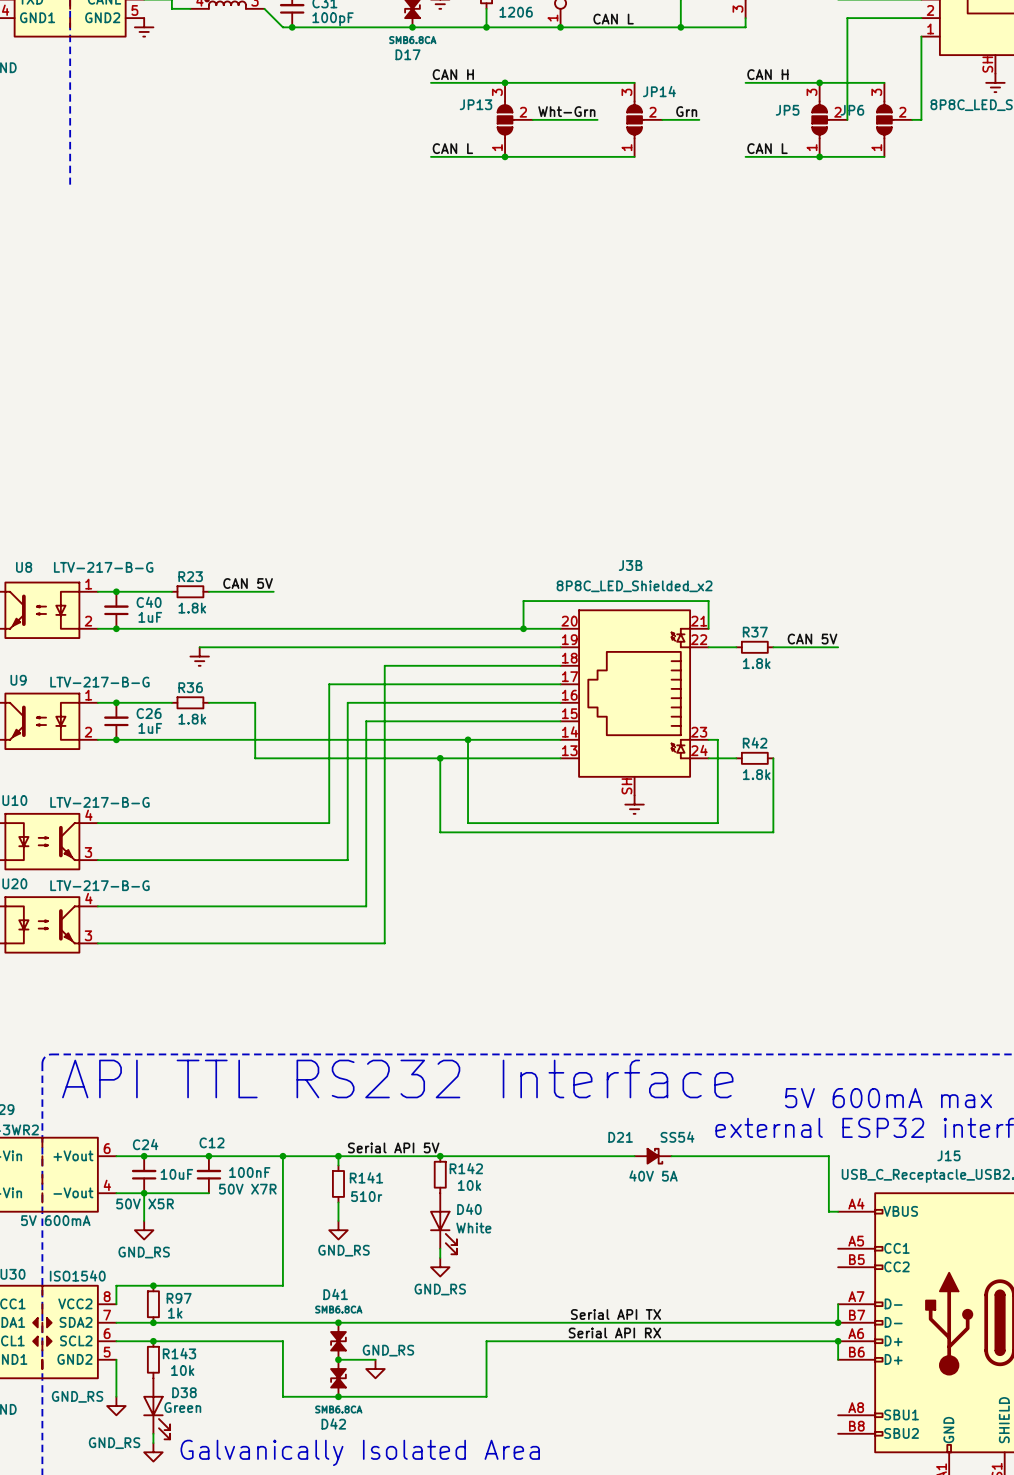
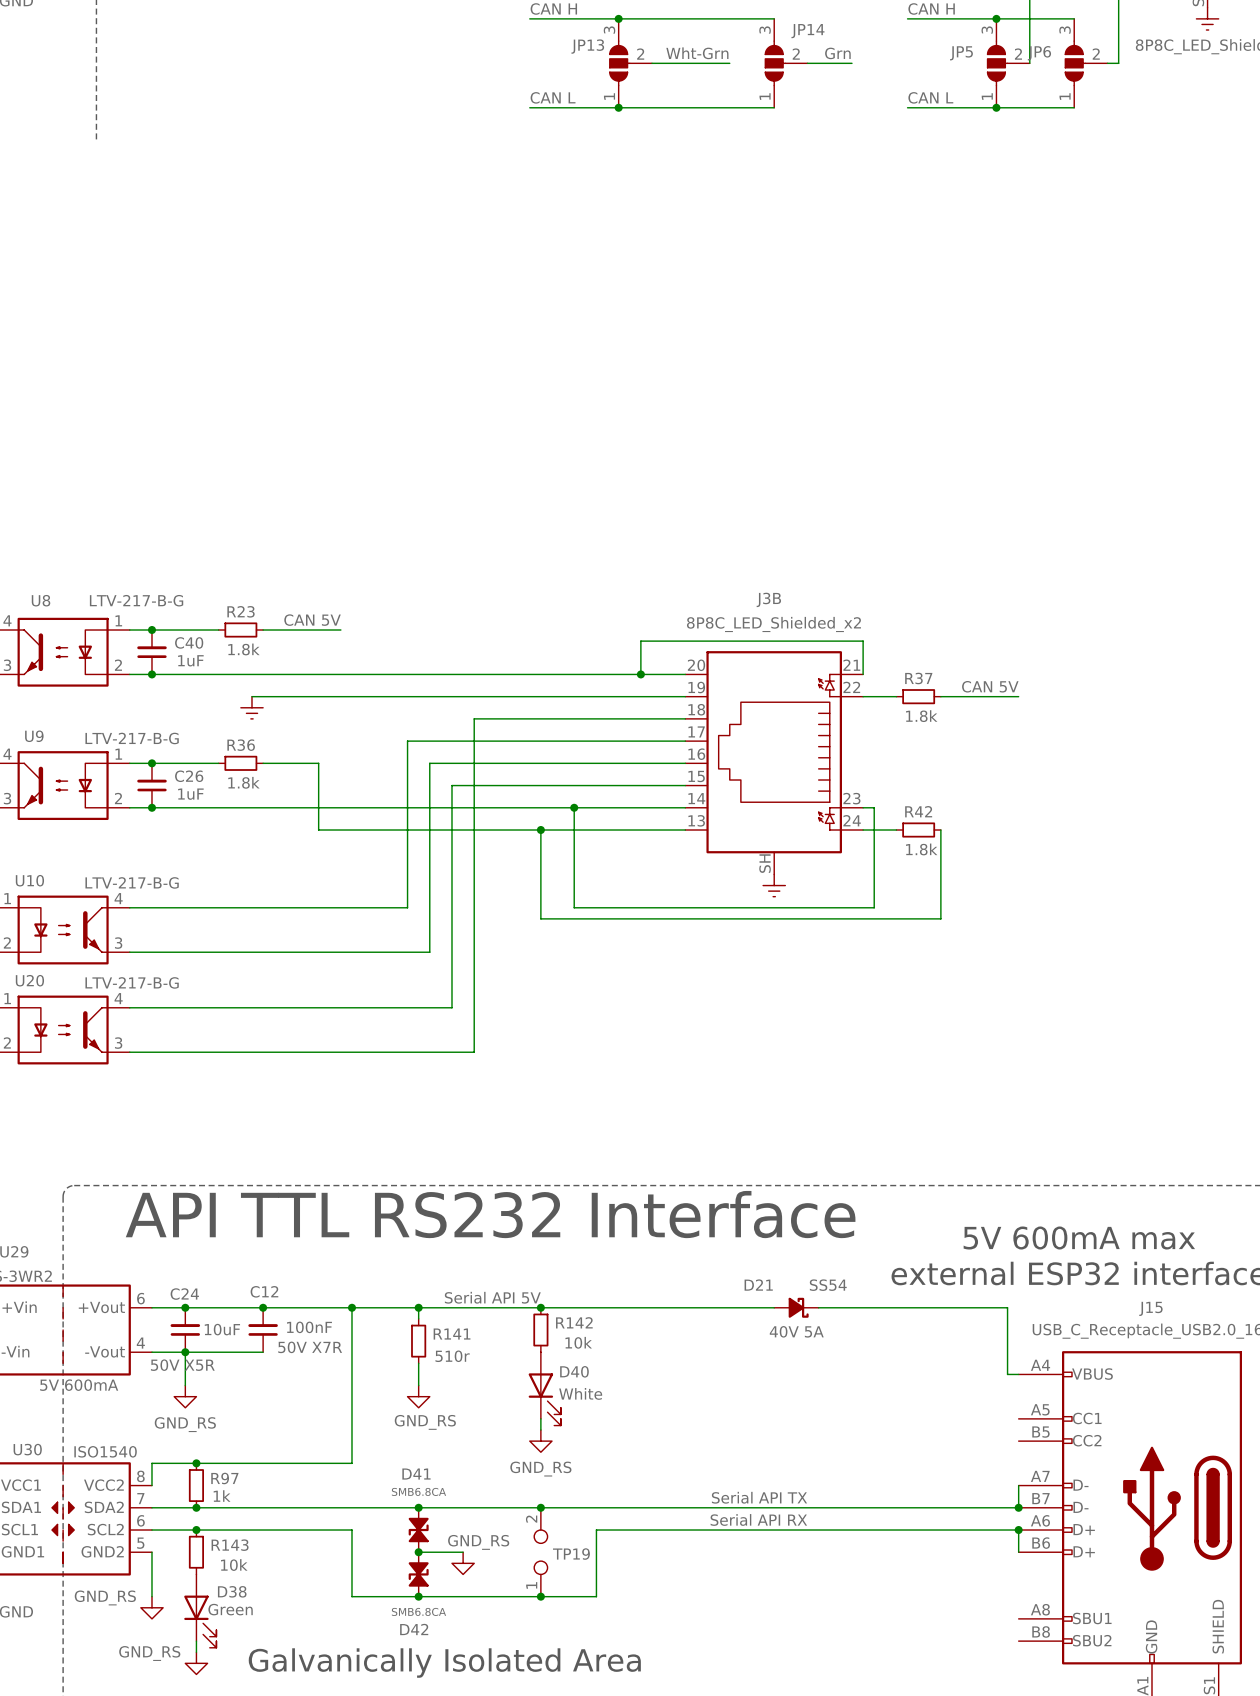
junction: none -> (540, 1507)
TP19: none -> (540, 1552)
junction: none -> (540, 1596)

